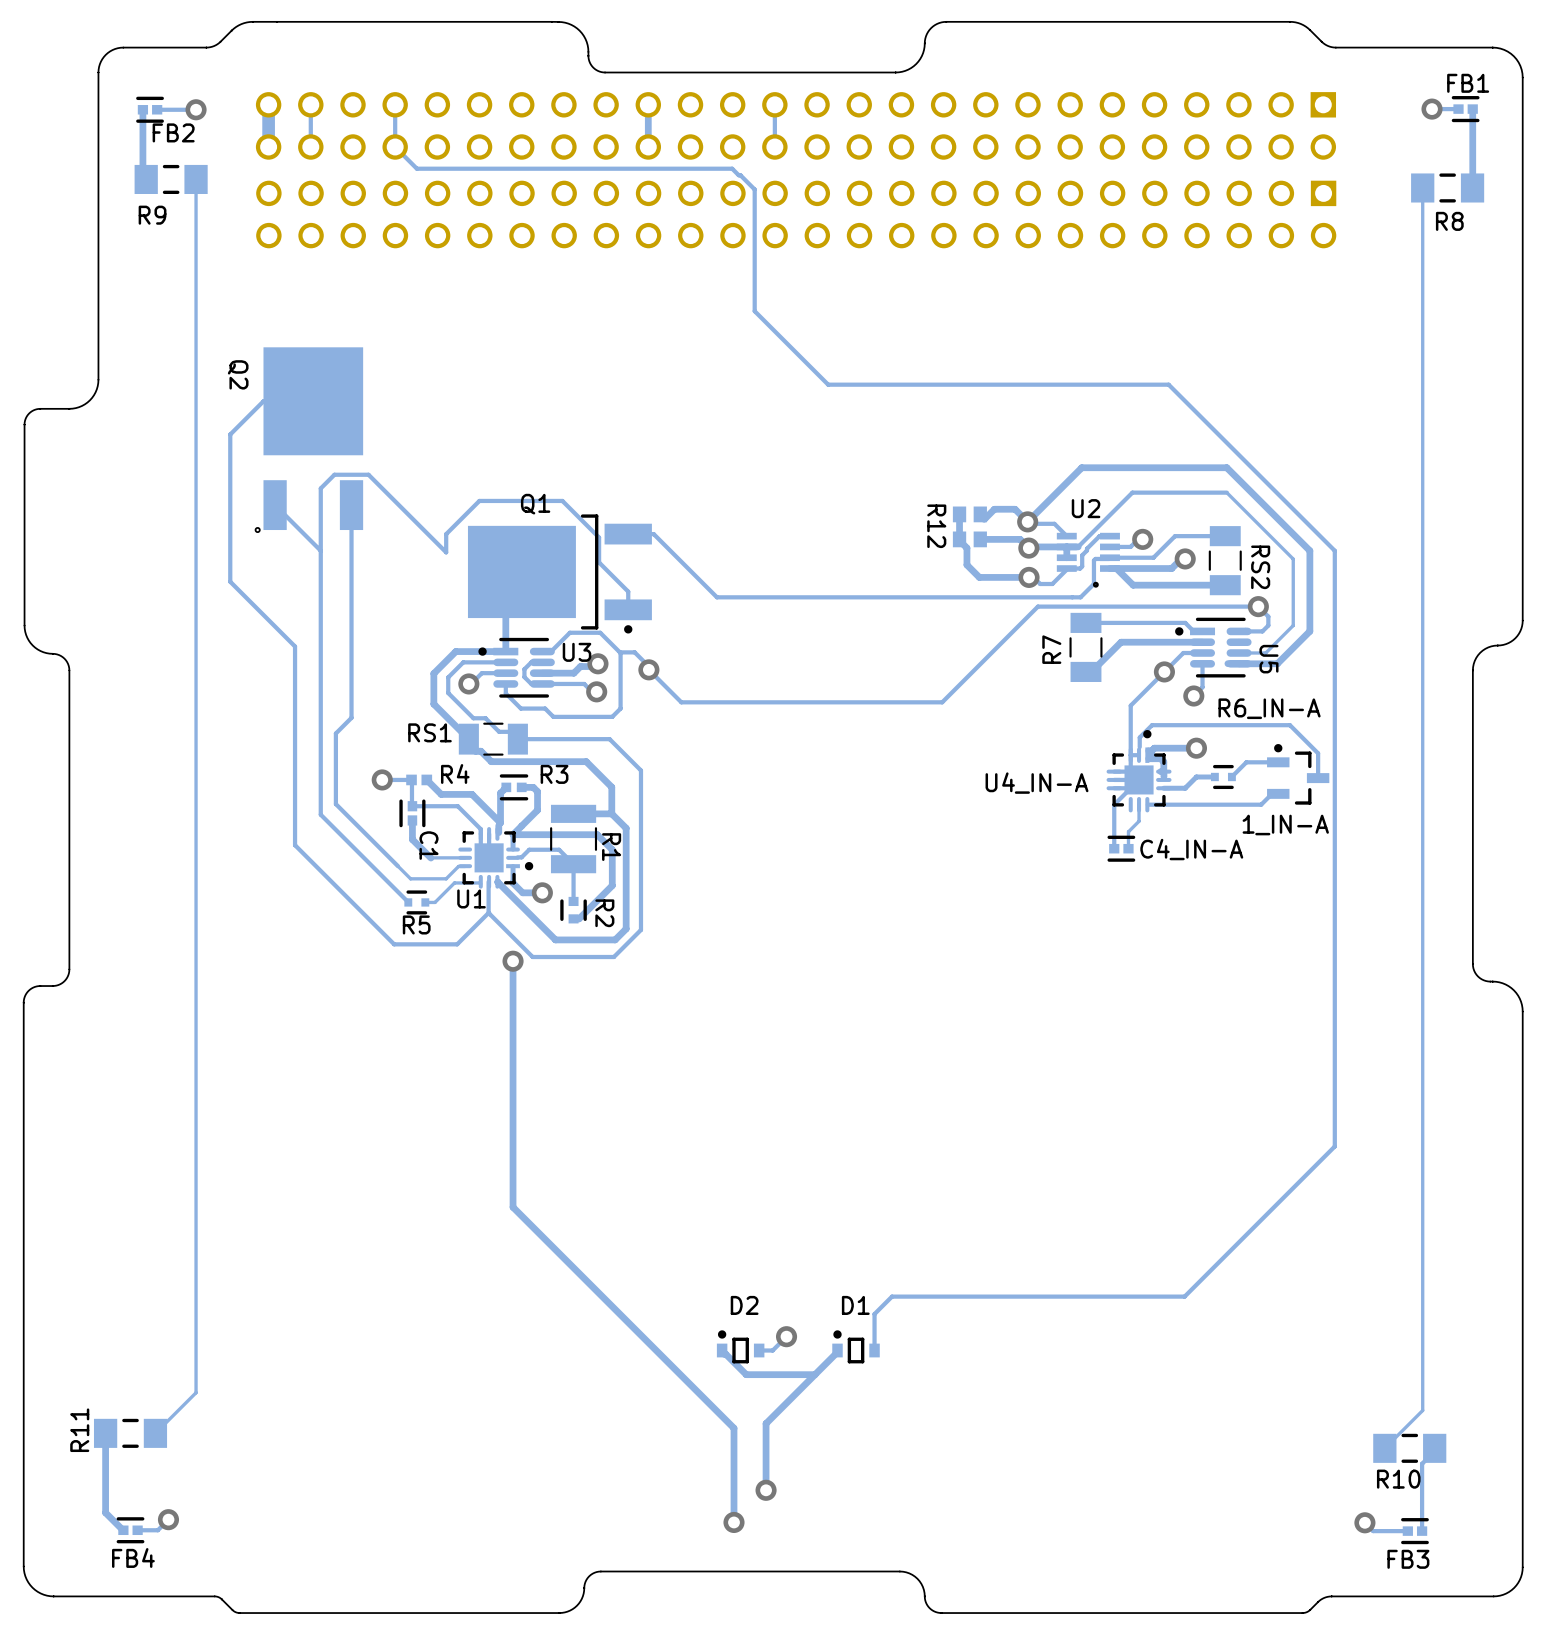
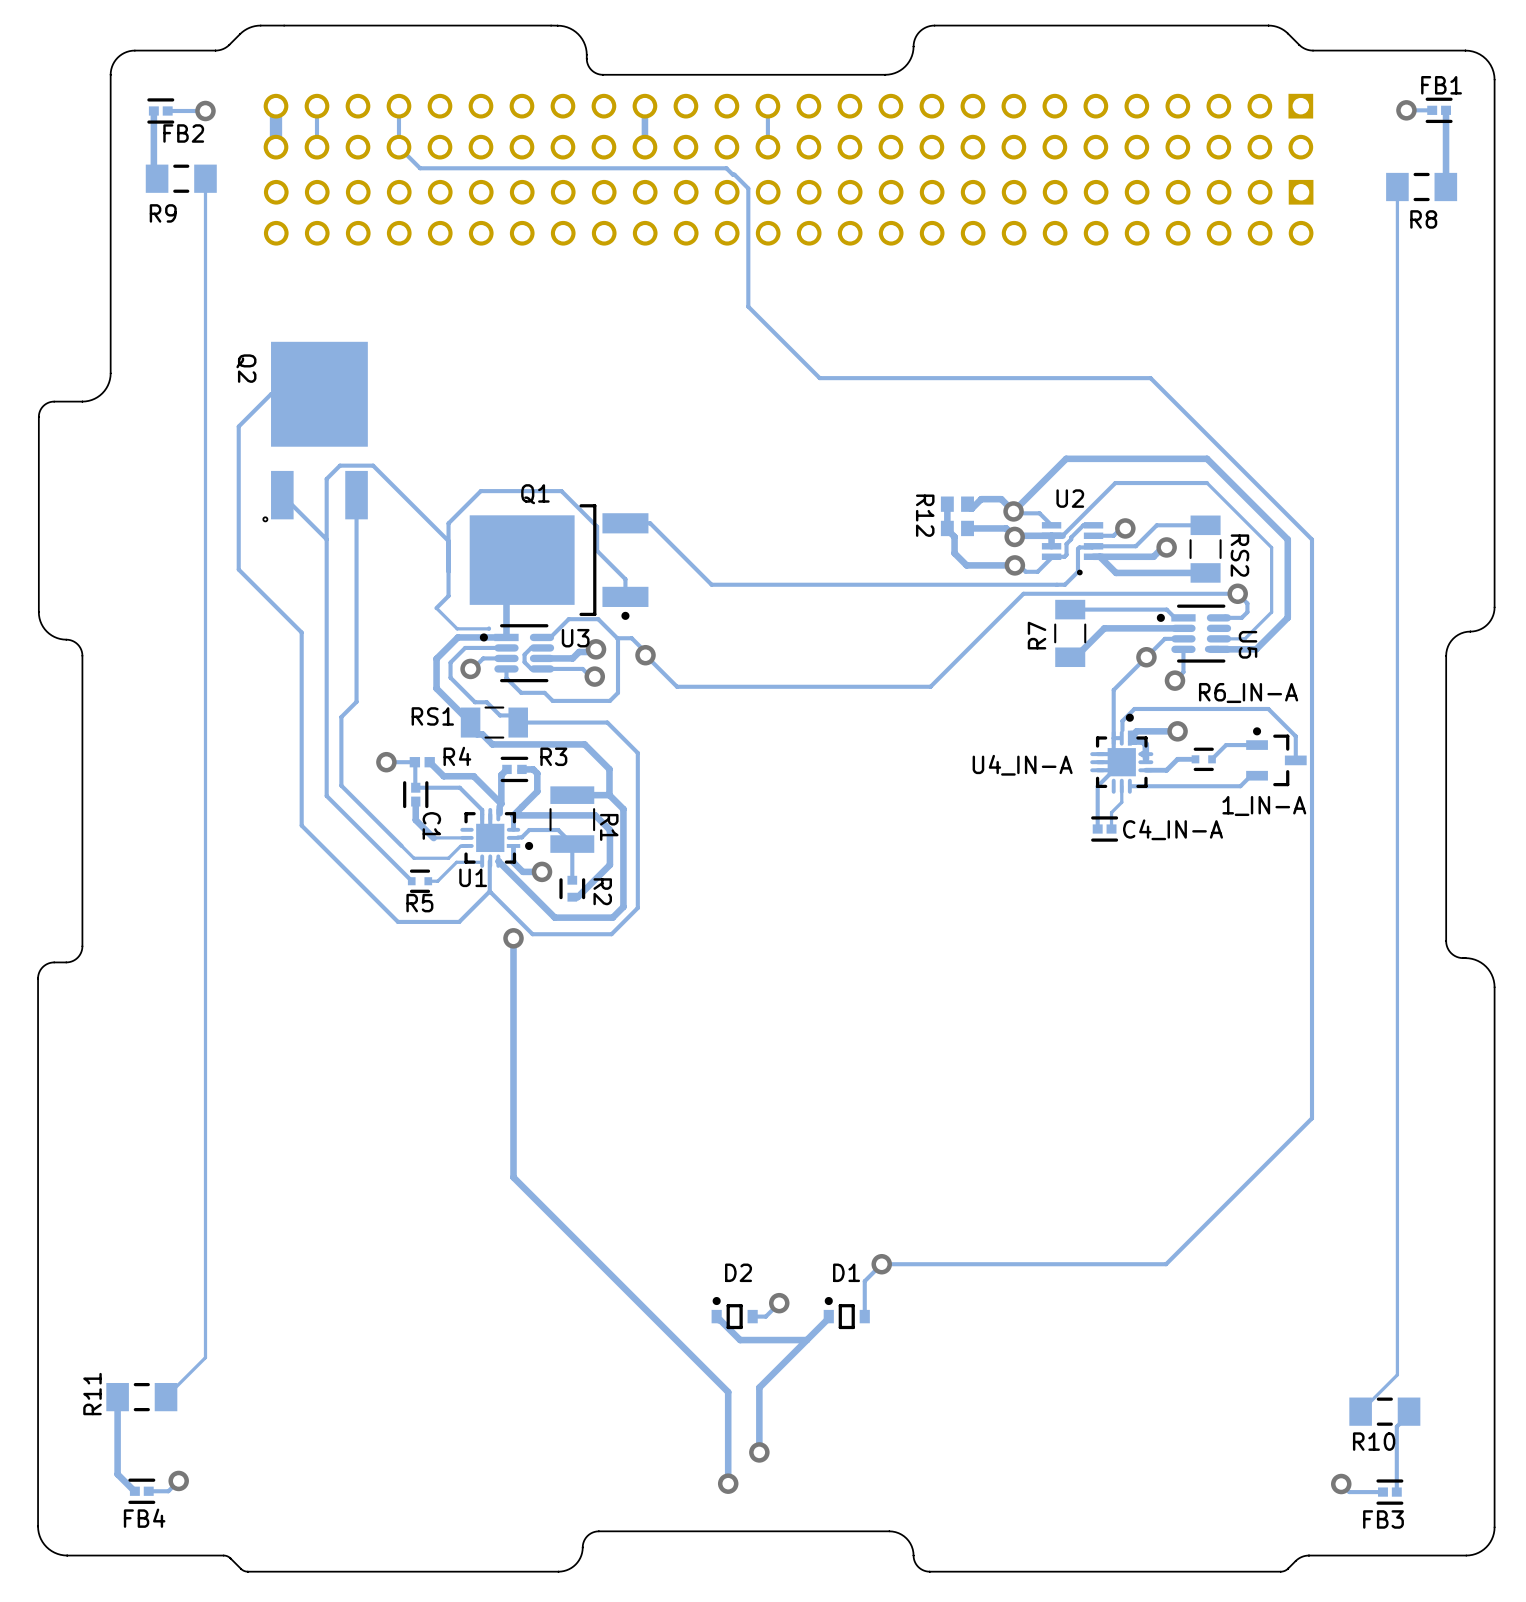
track: none -> (448, 541) (448, 596) (436, 608) (457, 628) (489, 628)
via: none -> (881, 1264)

